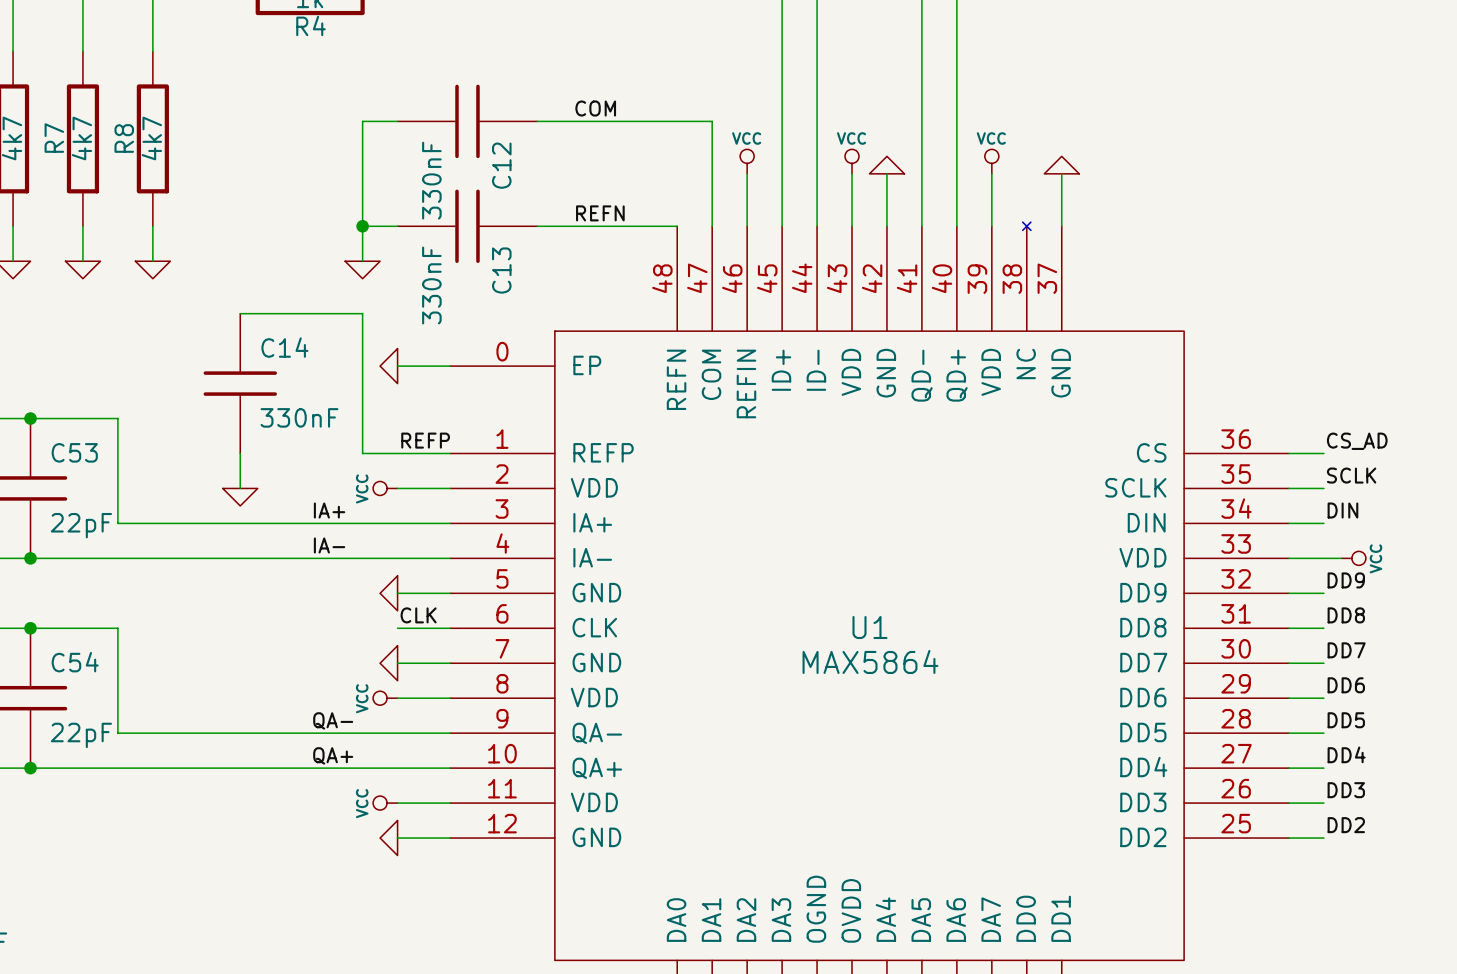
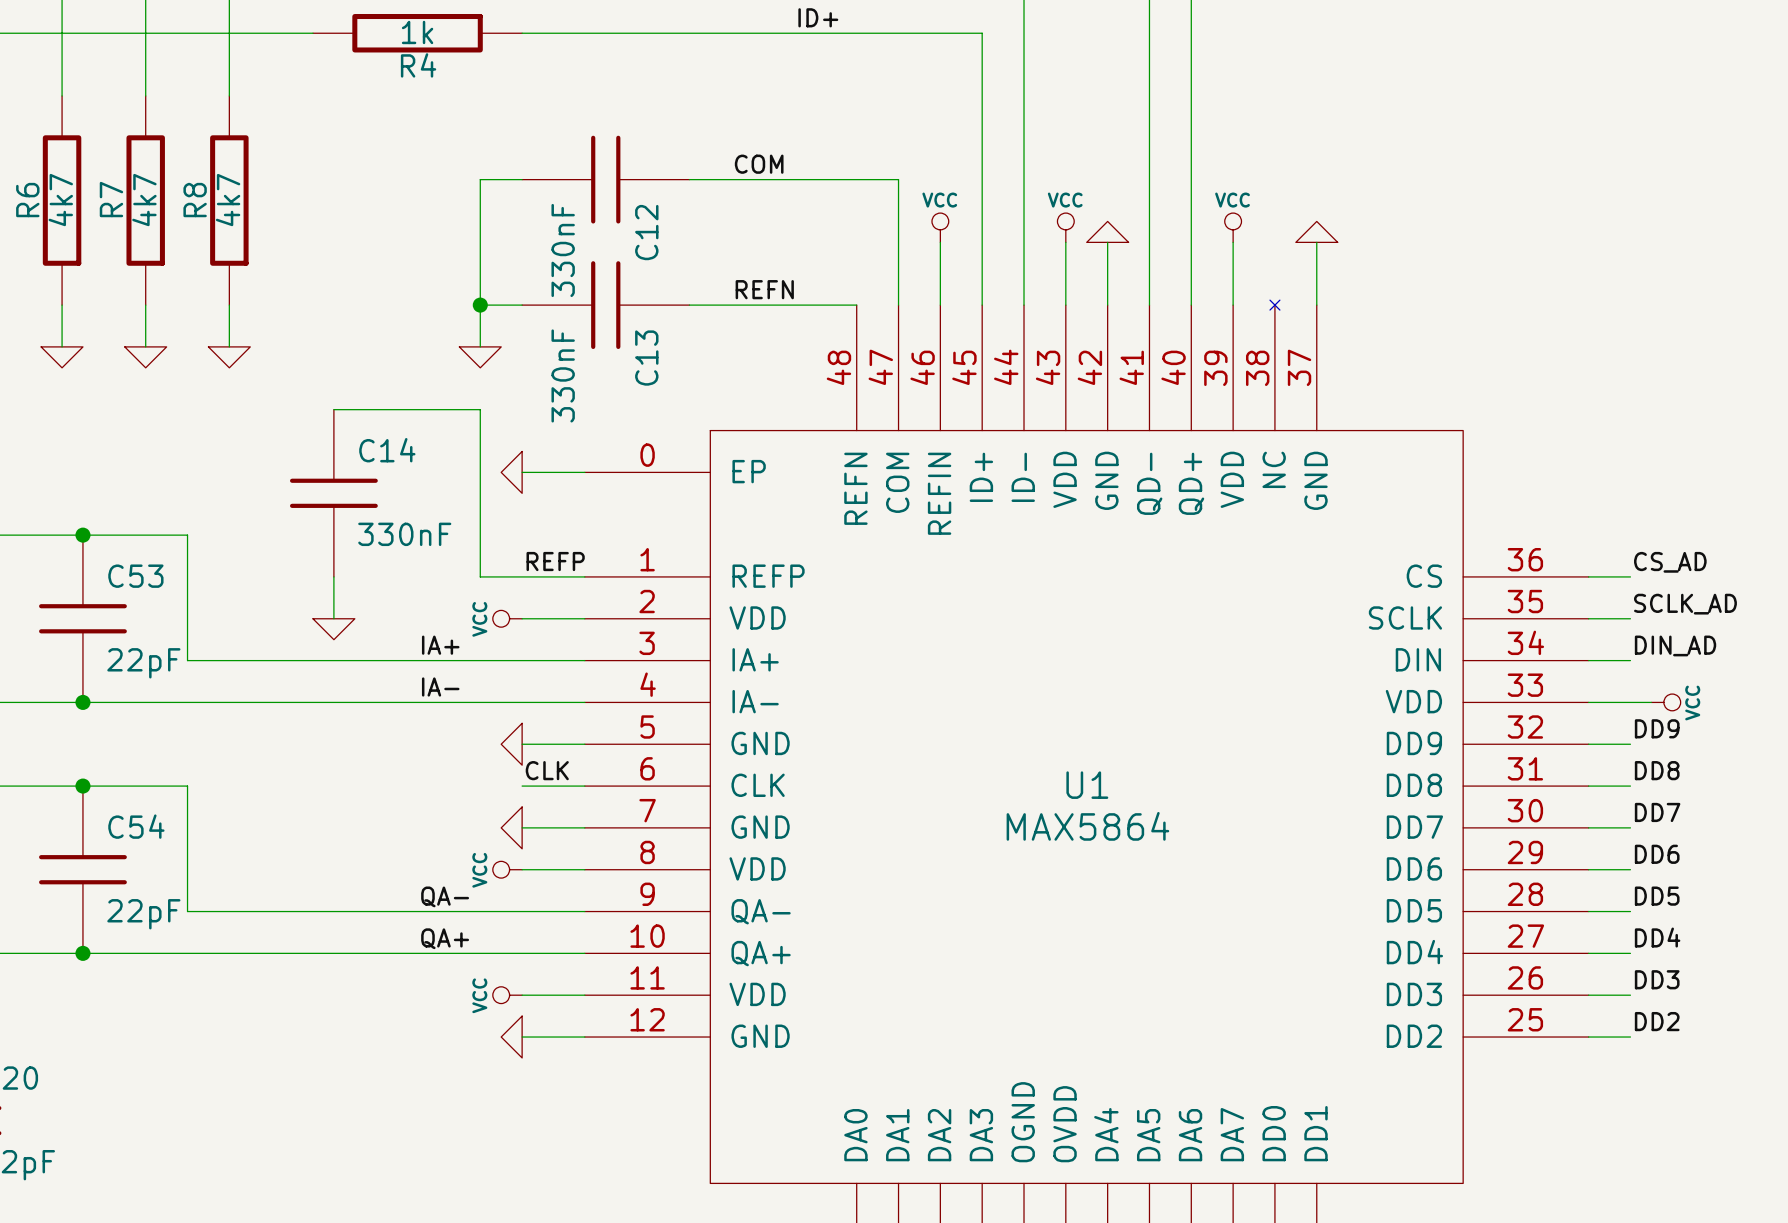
label: SCLK (1351, 475) -> SCLK_AD (1685, 604)
label: DIN (1342, 510) -> DIN_AD (1675, 645)

